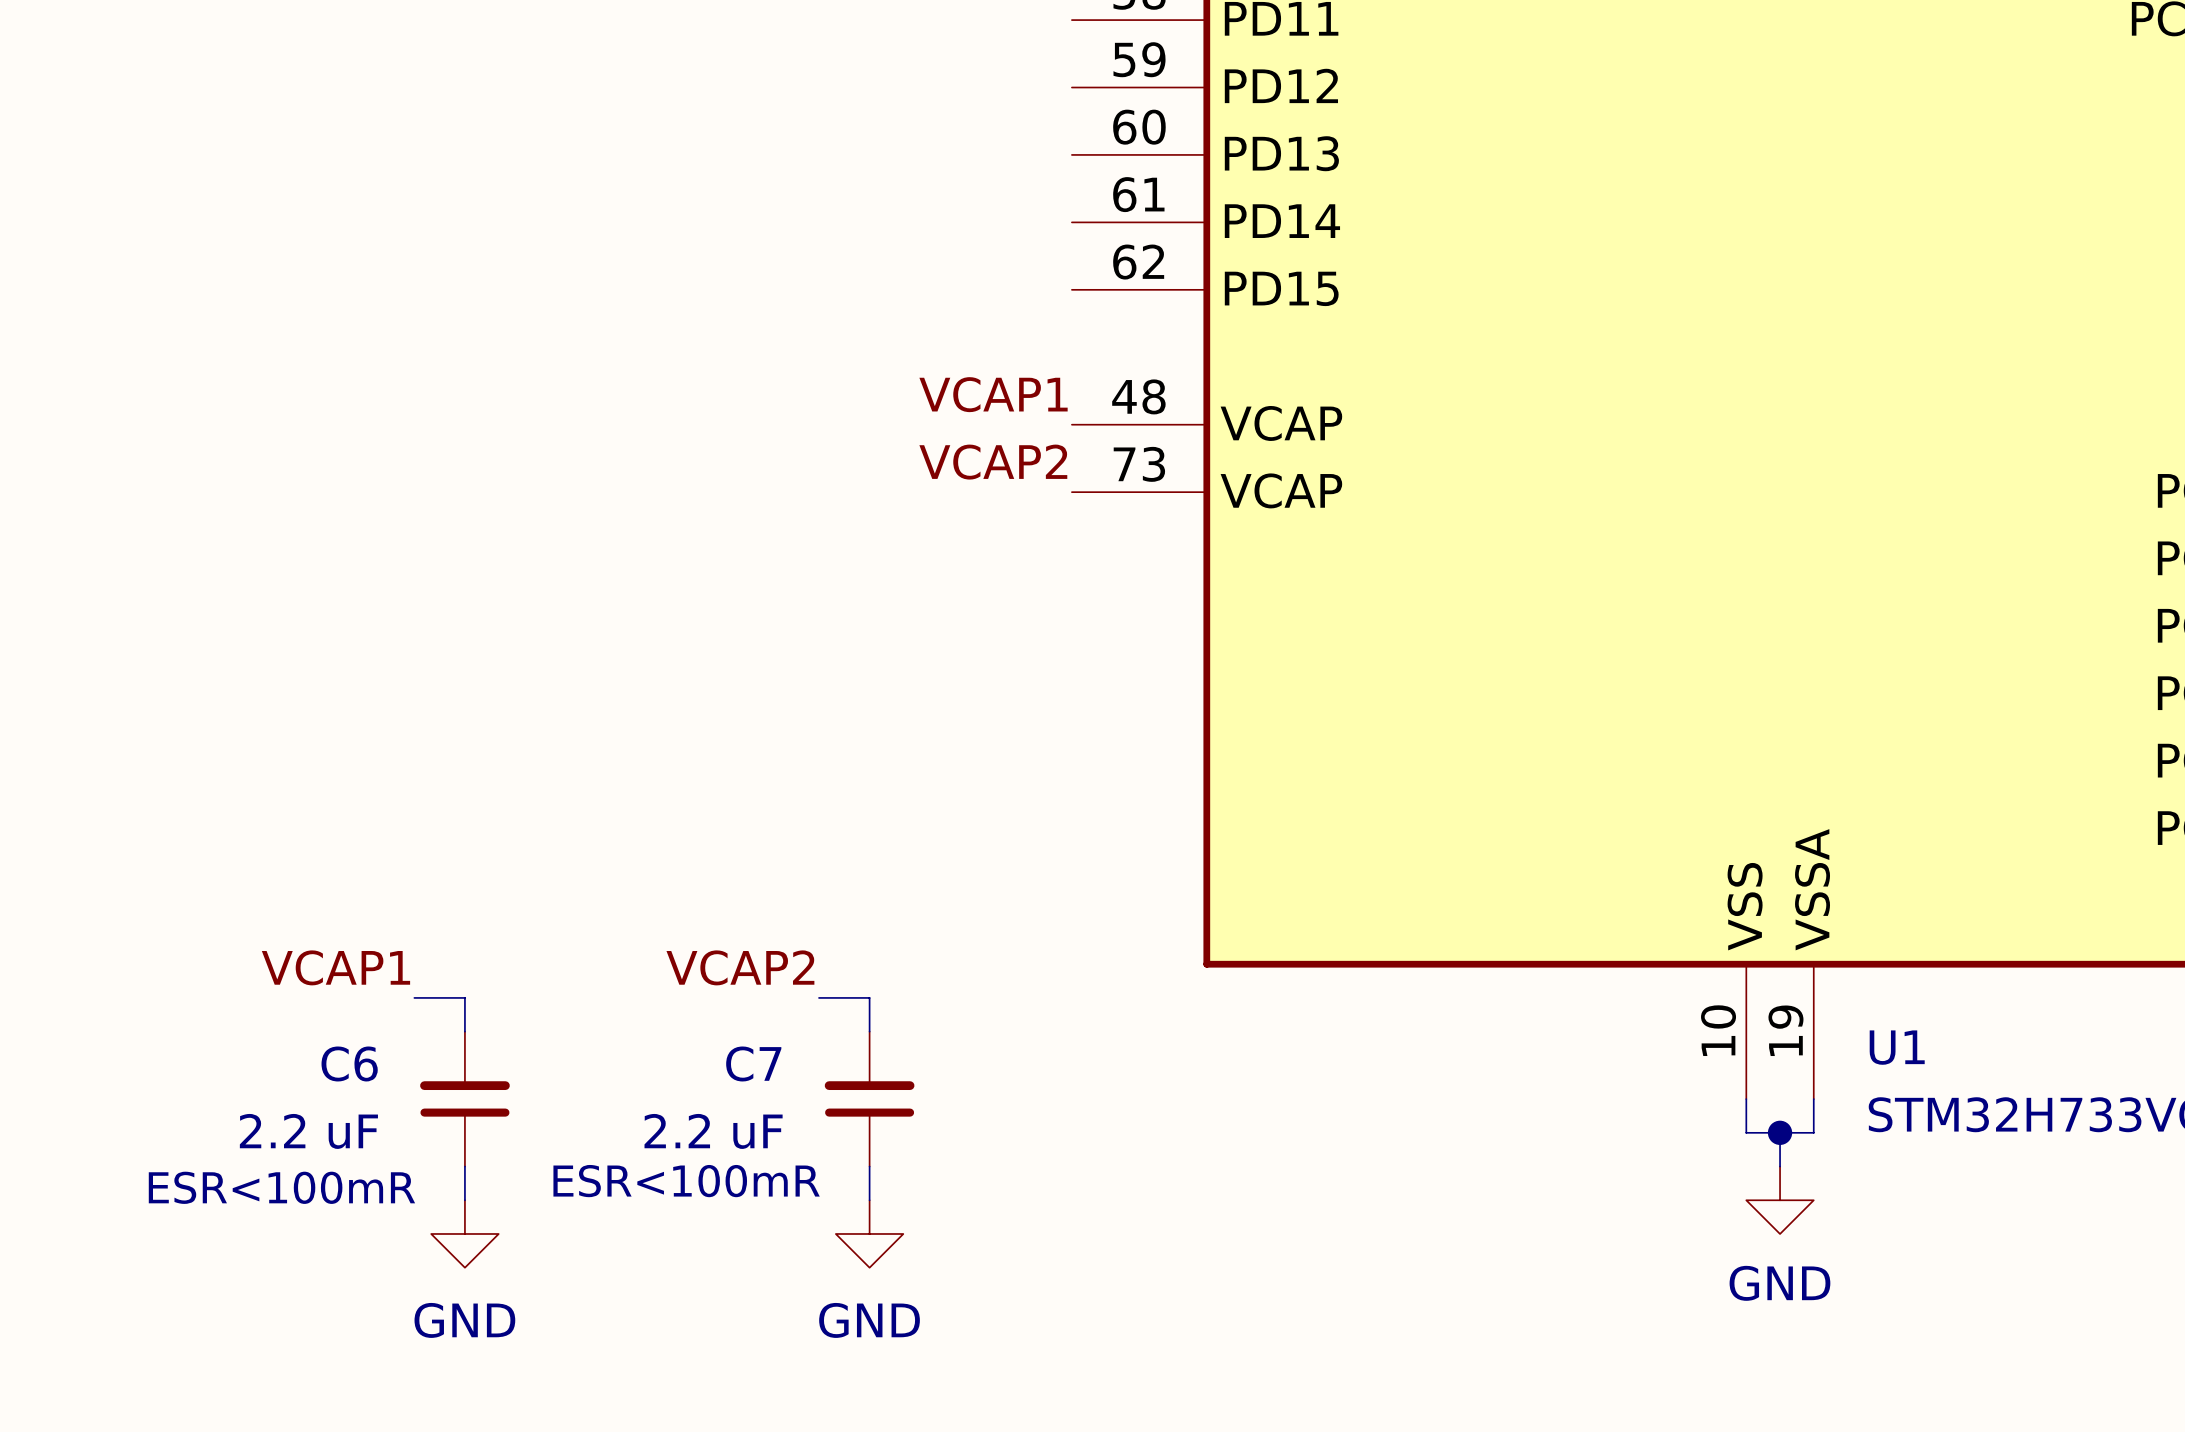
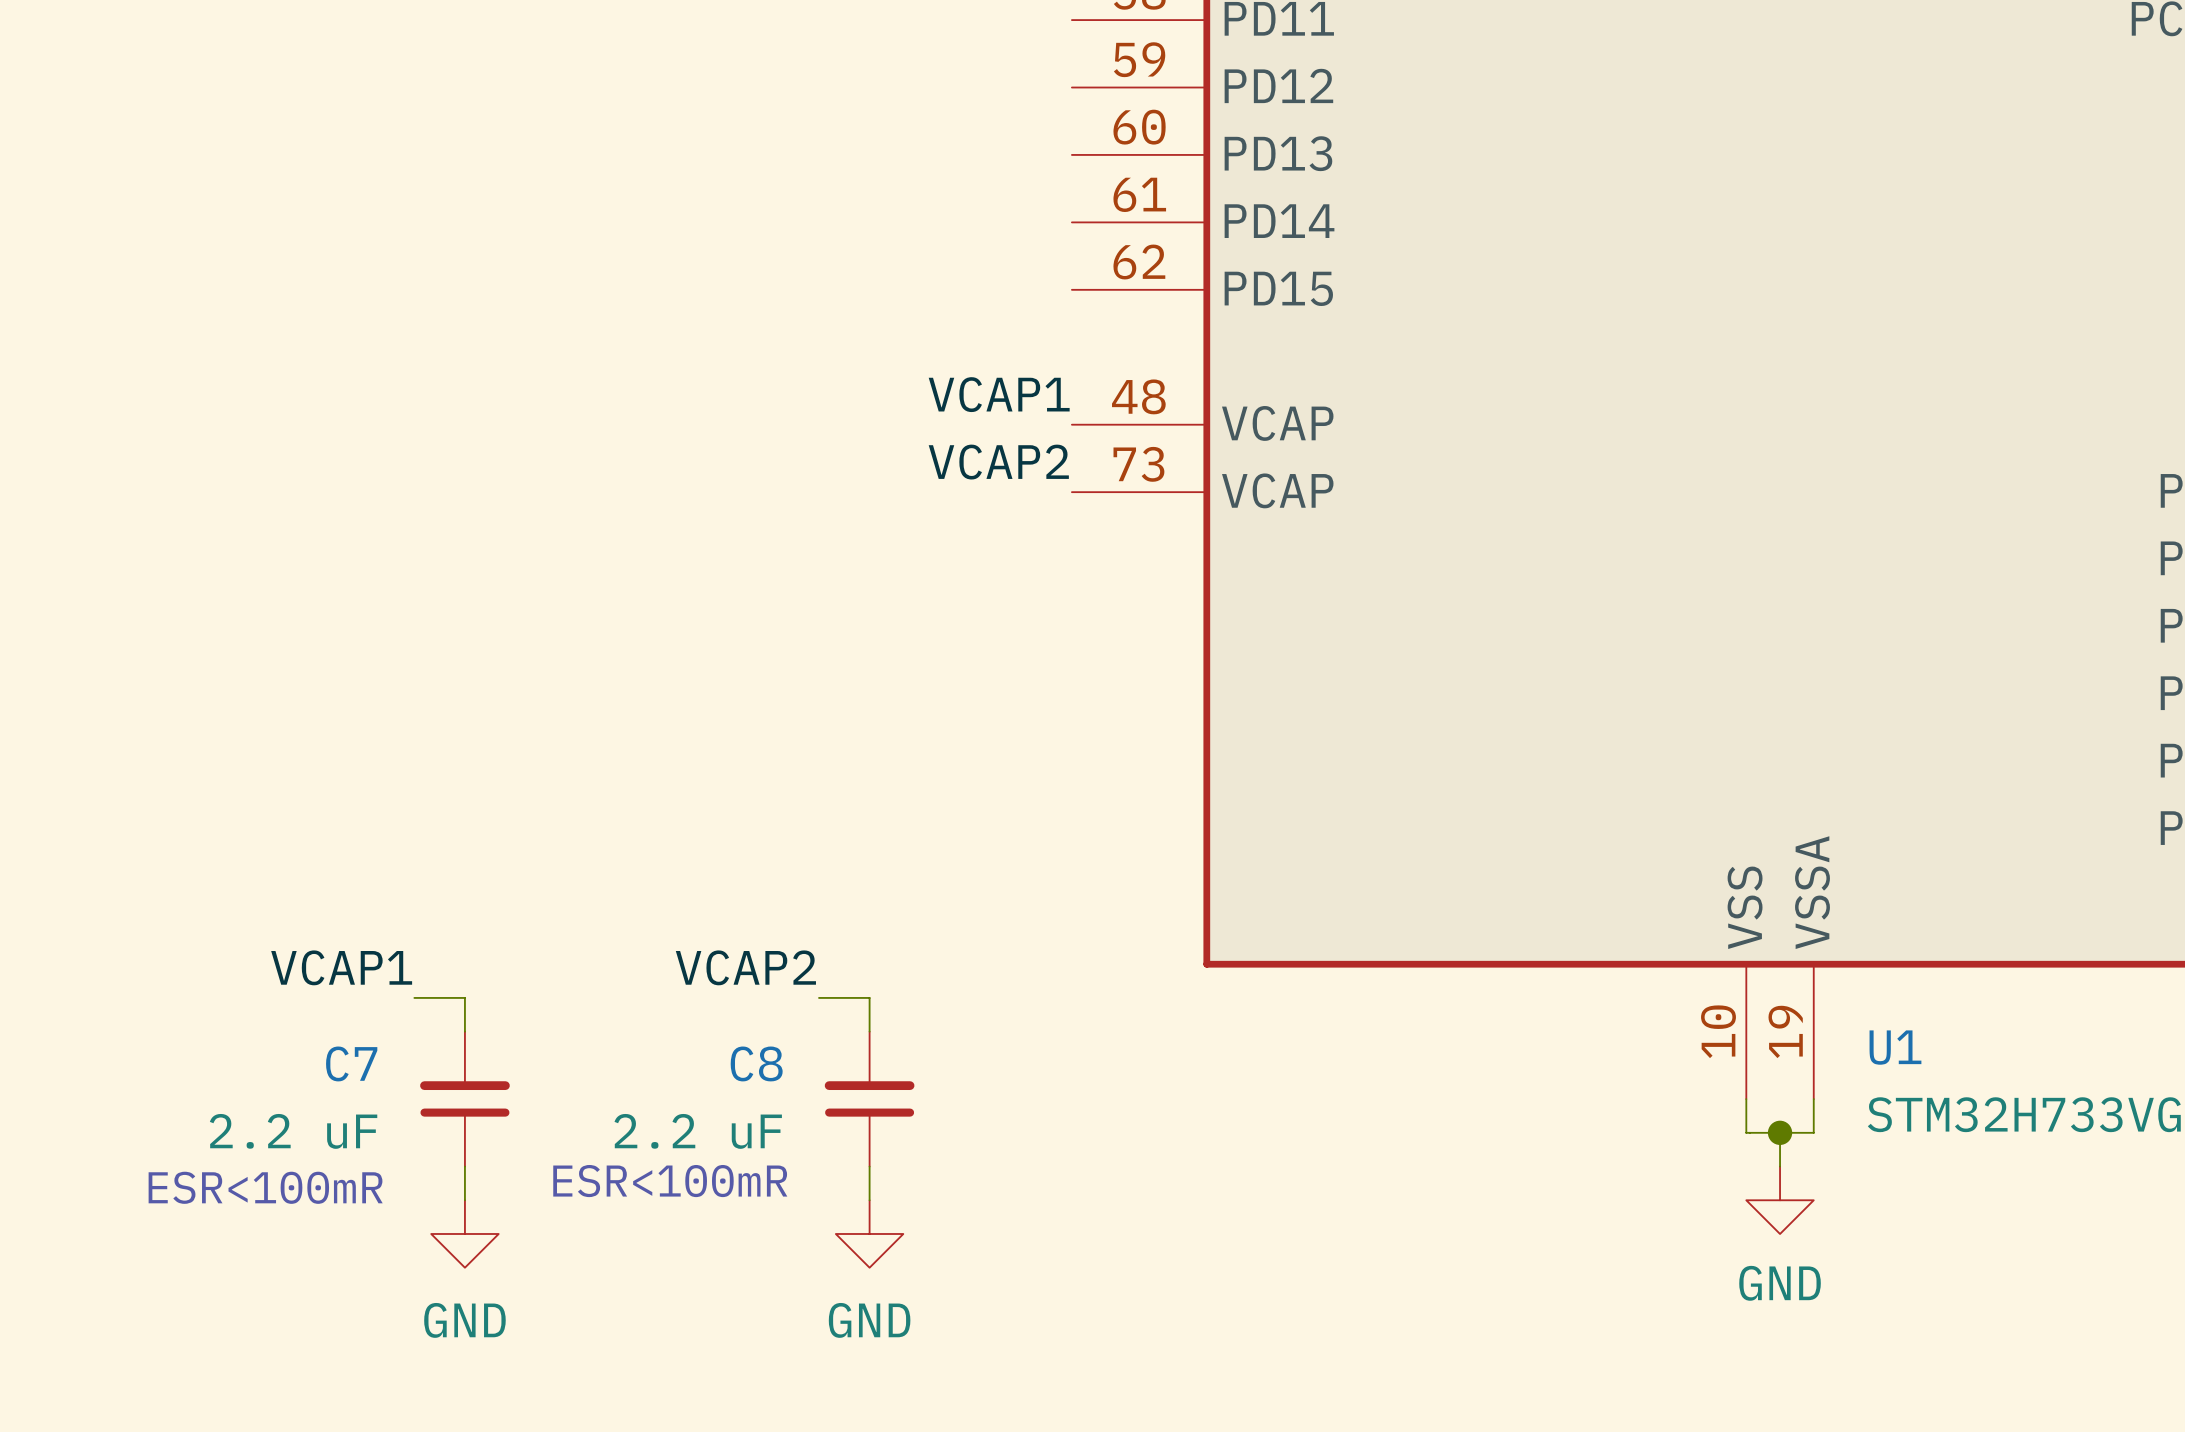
C6 name: C6 (349, 1063) -> C7 (351, 1063)
C7 name: C7 (753, 1063) -> C8 (756, 1063)

